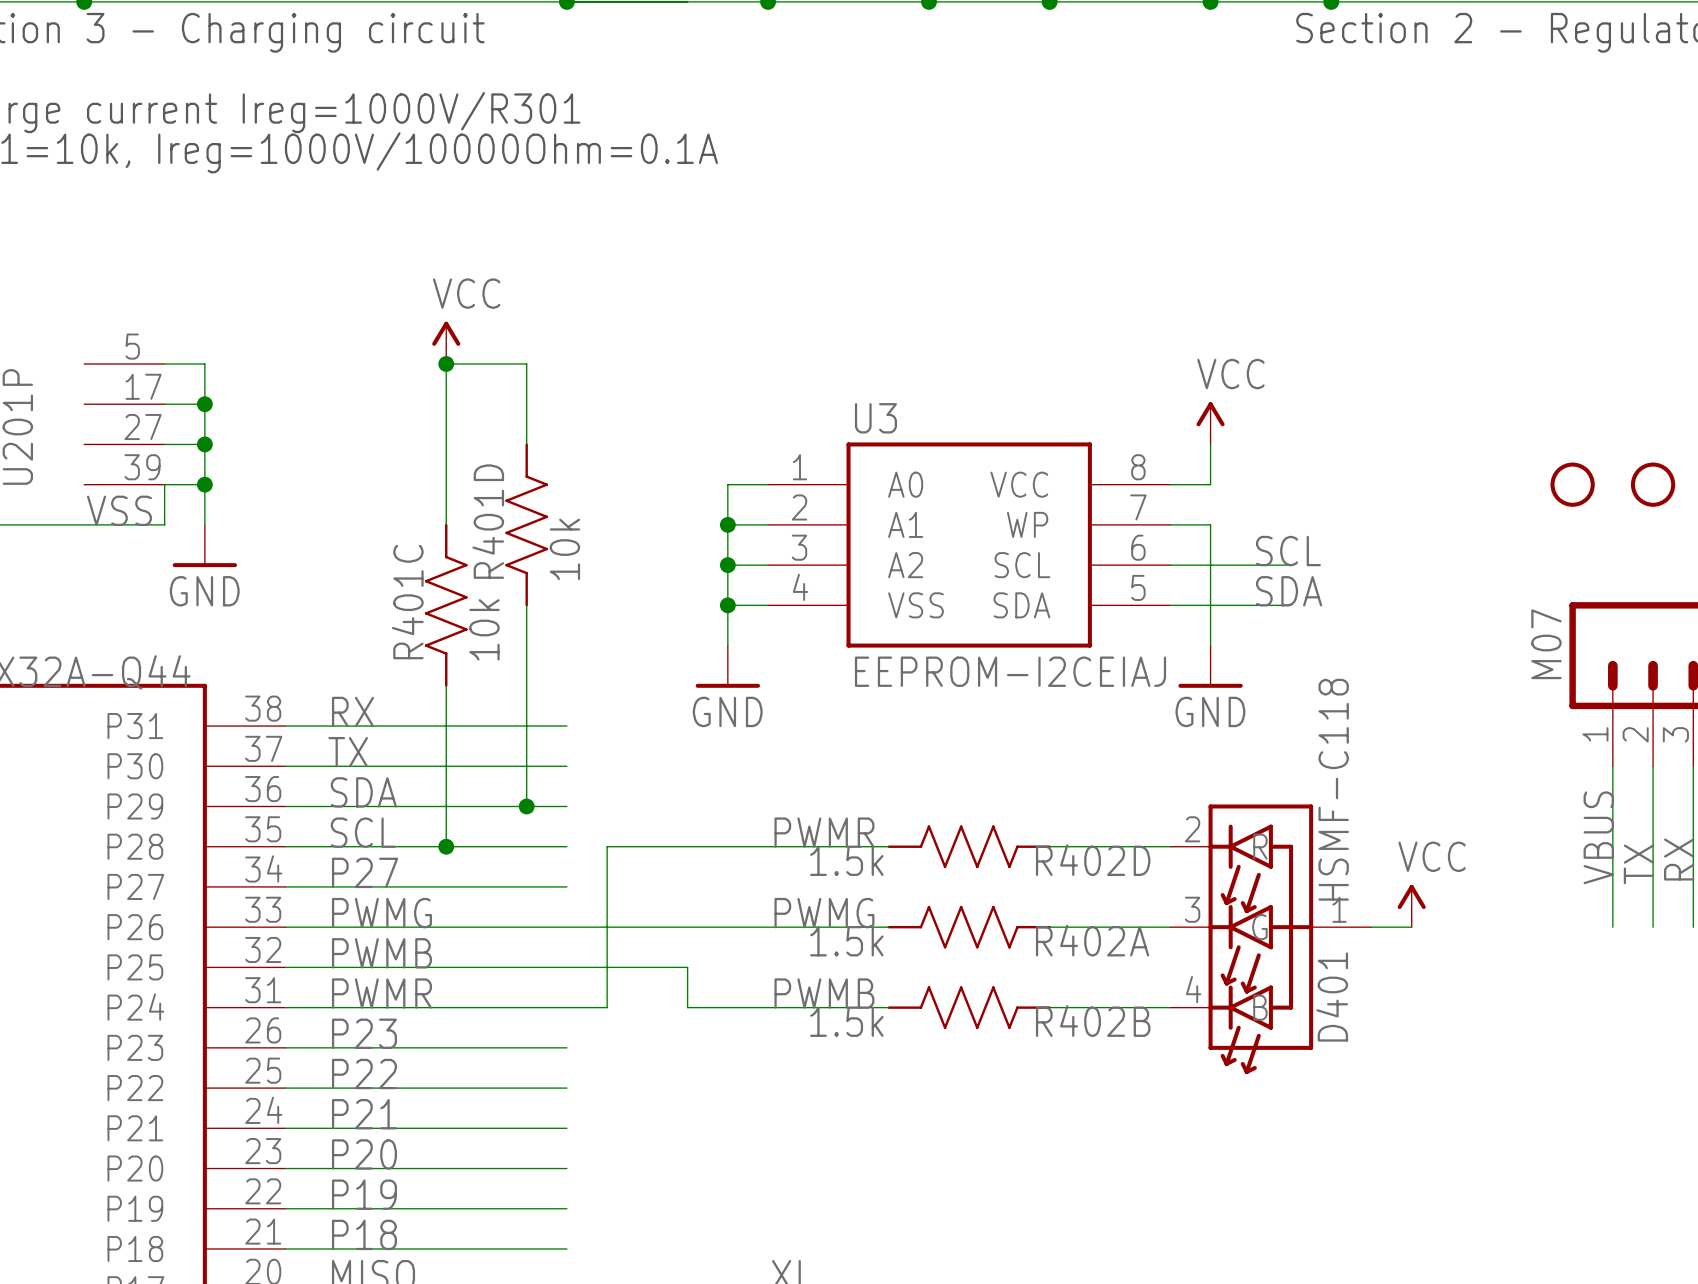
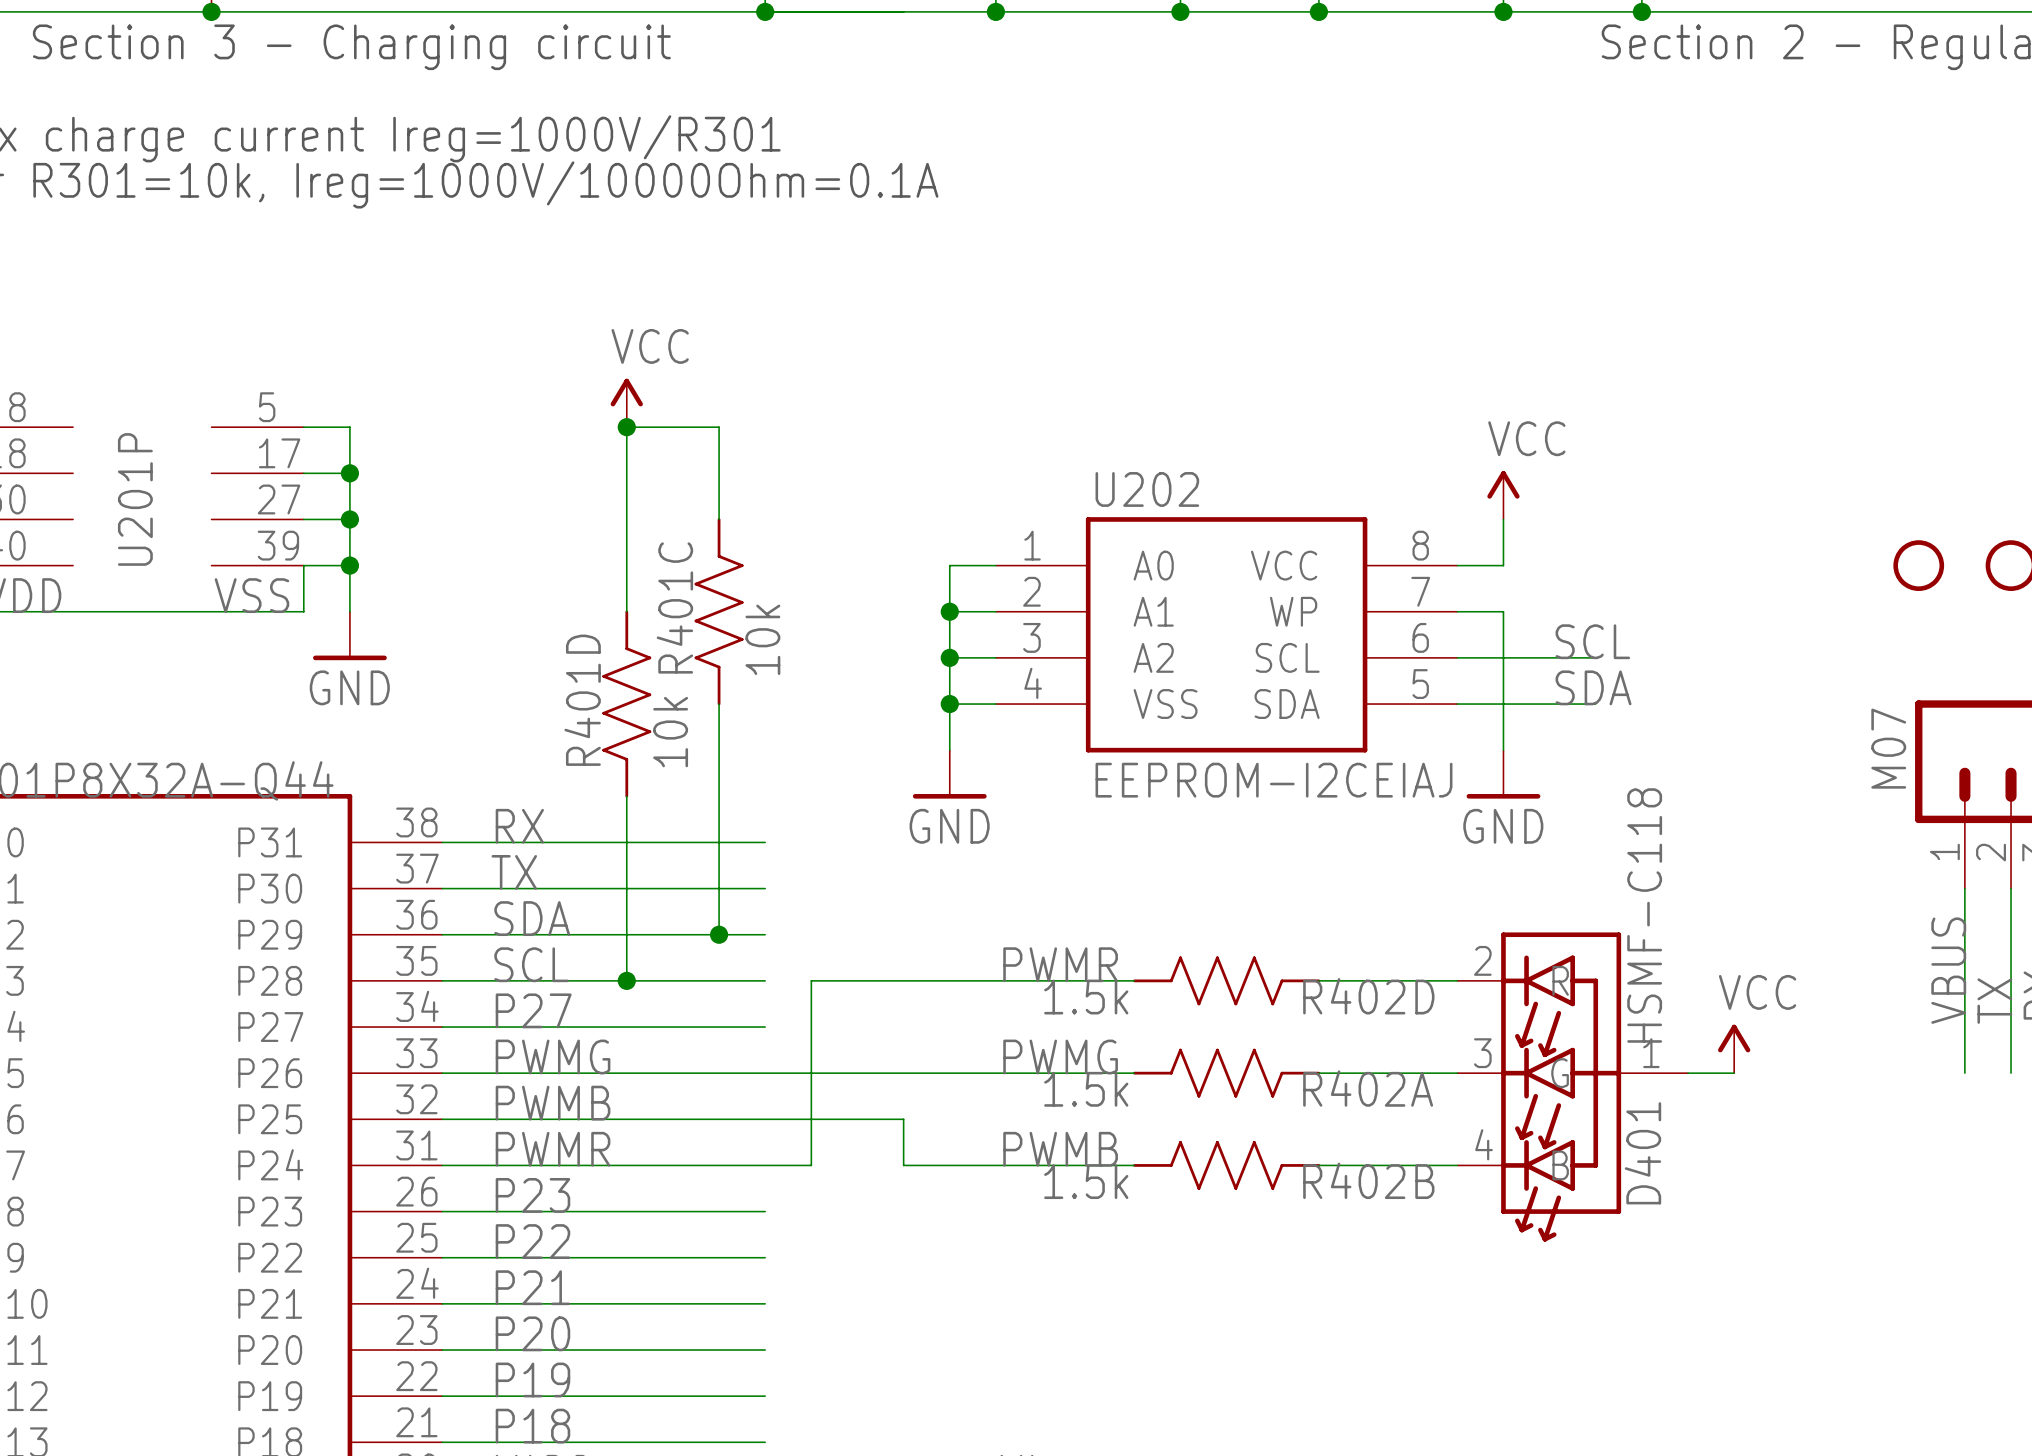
U3 name: U3 (875, 418) -> U202 (1147, 489)
R401D name: R401D (488, 521) -> R401C (674, 607)
R401C name: R401C (407, 602) -> R401D (582, 700)

